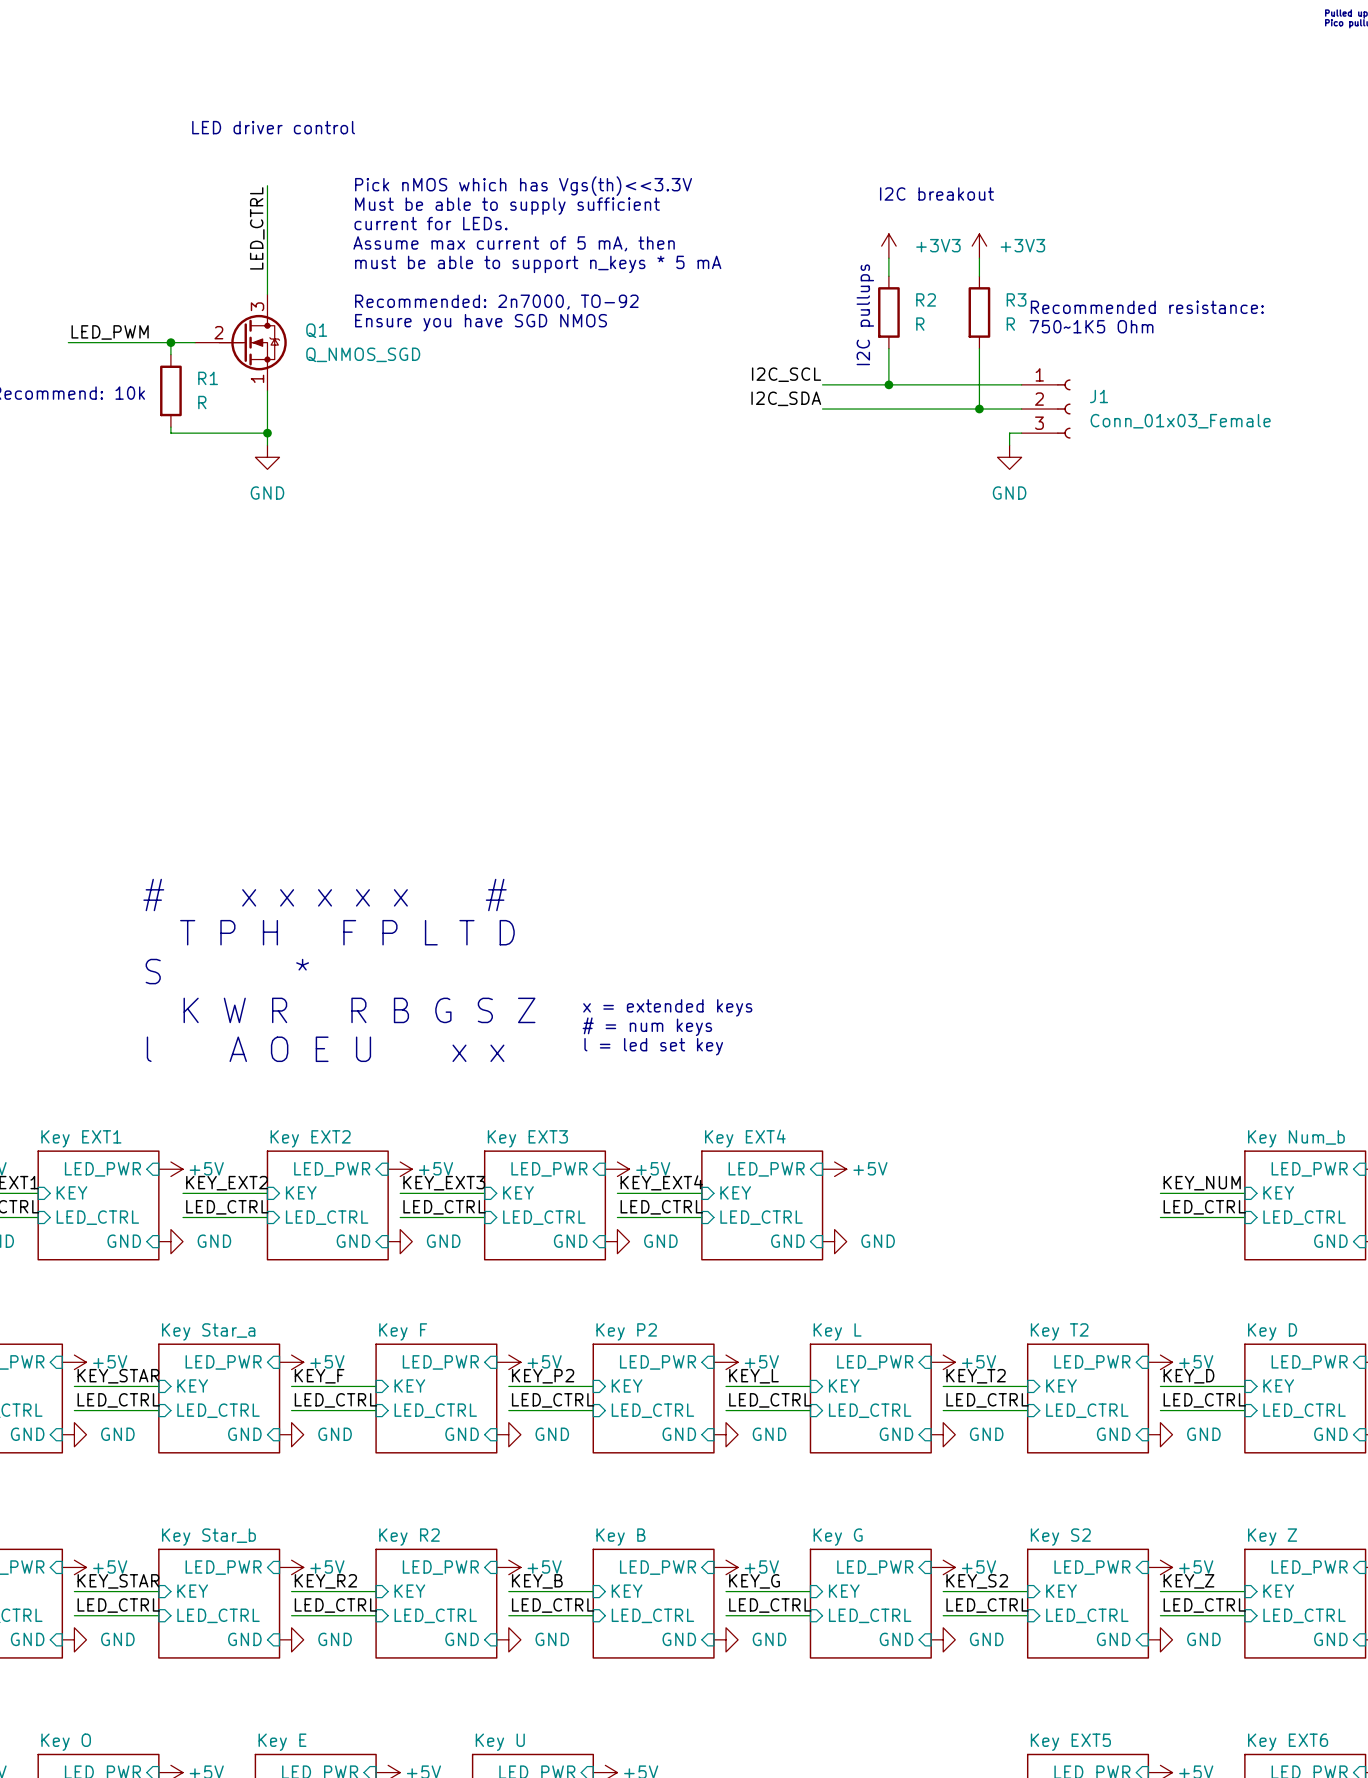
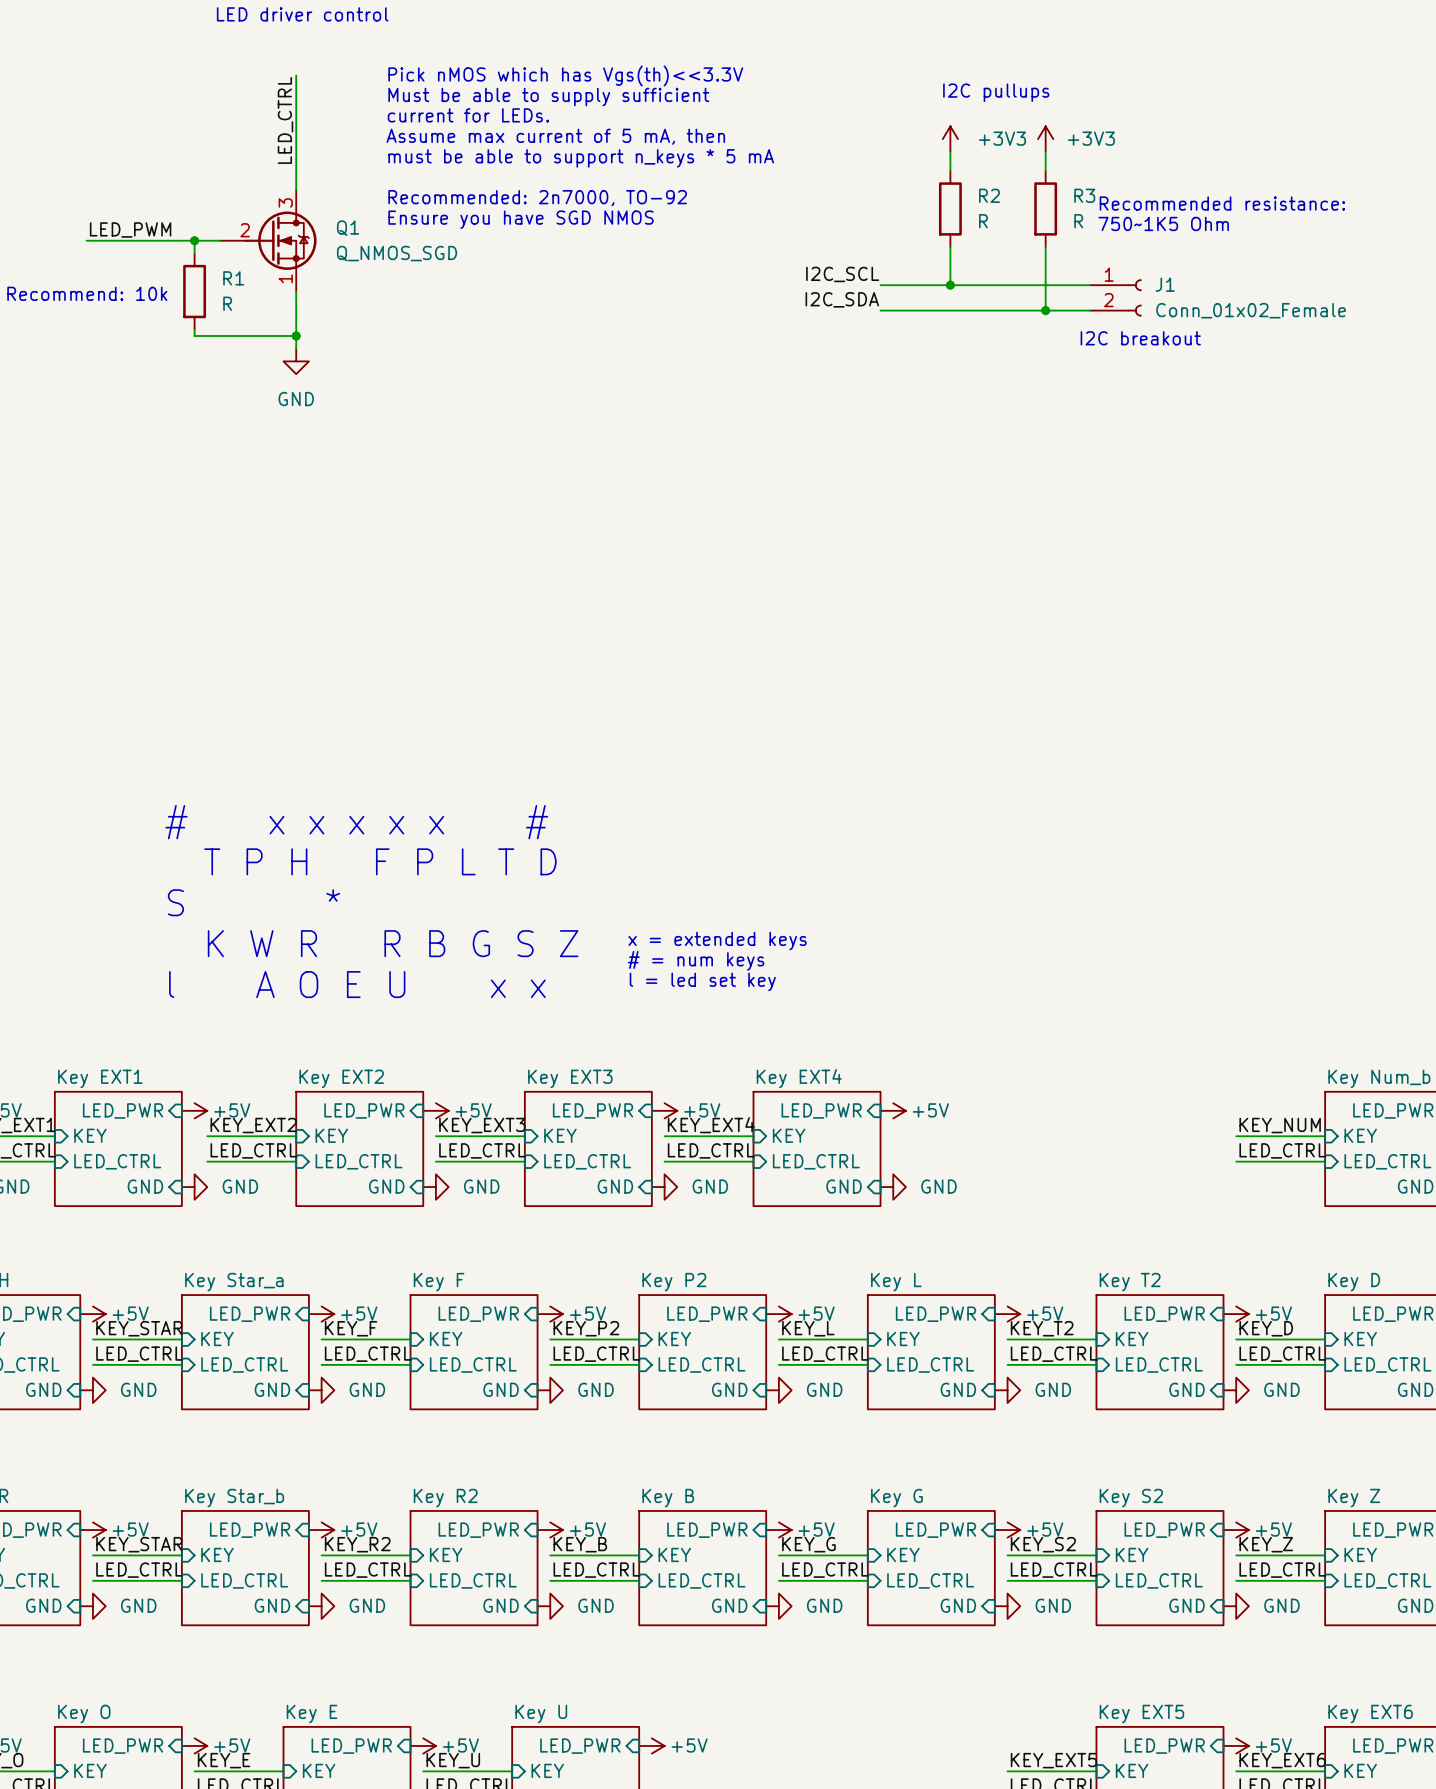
text: I2C breakout (936, 193) -> none
text rotation: 0° (865, 314) -> 90° clockwise (996, 92)
text position: I2C pullups (865, 314) -> I2C pullups (996, 92)
J1 symbol: [1021, 379, 1071, 439] -> [1090, 279, 1142, 317]
J1 value: Conn_01x03_Female (1180, 421) -> Conn_01x02_Female (1251, 310)
wire: (1021, 433) (1009, 433) (1009, 445) -> none
text: none -> I2C breakout (1140, 338)
power symbol: GND (1009, 457) -> none

